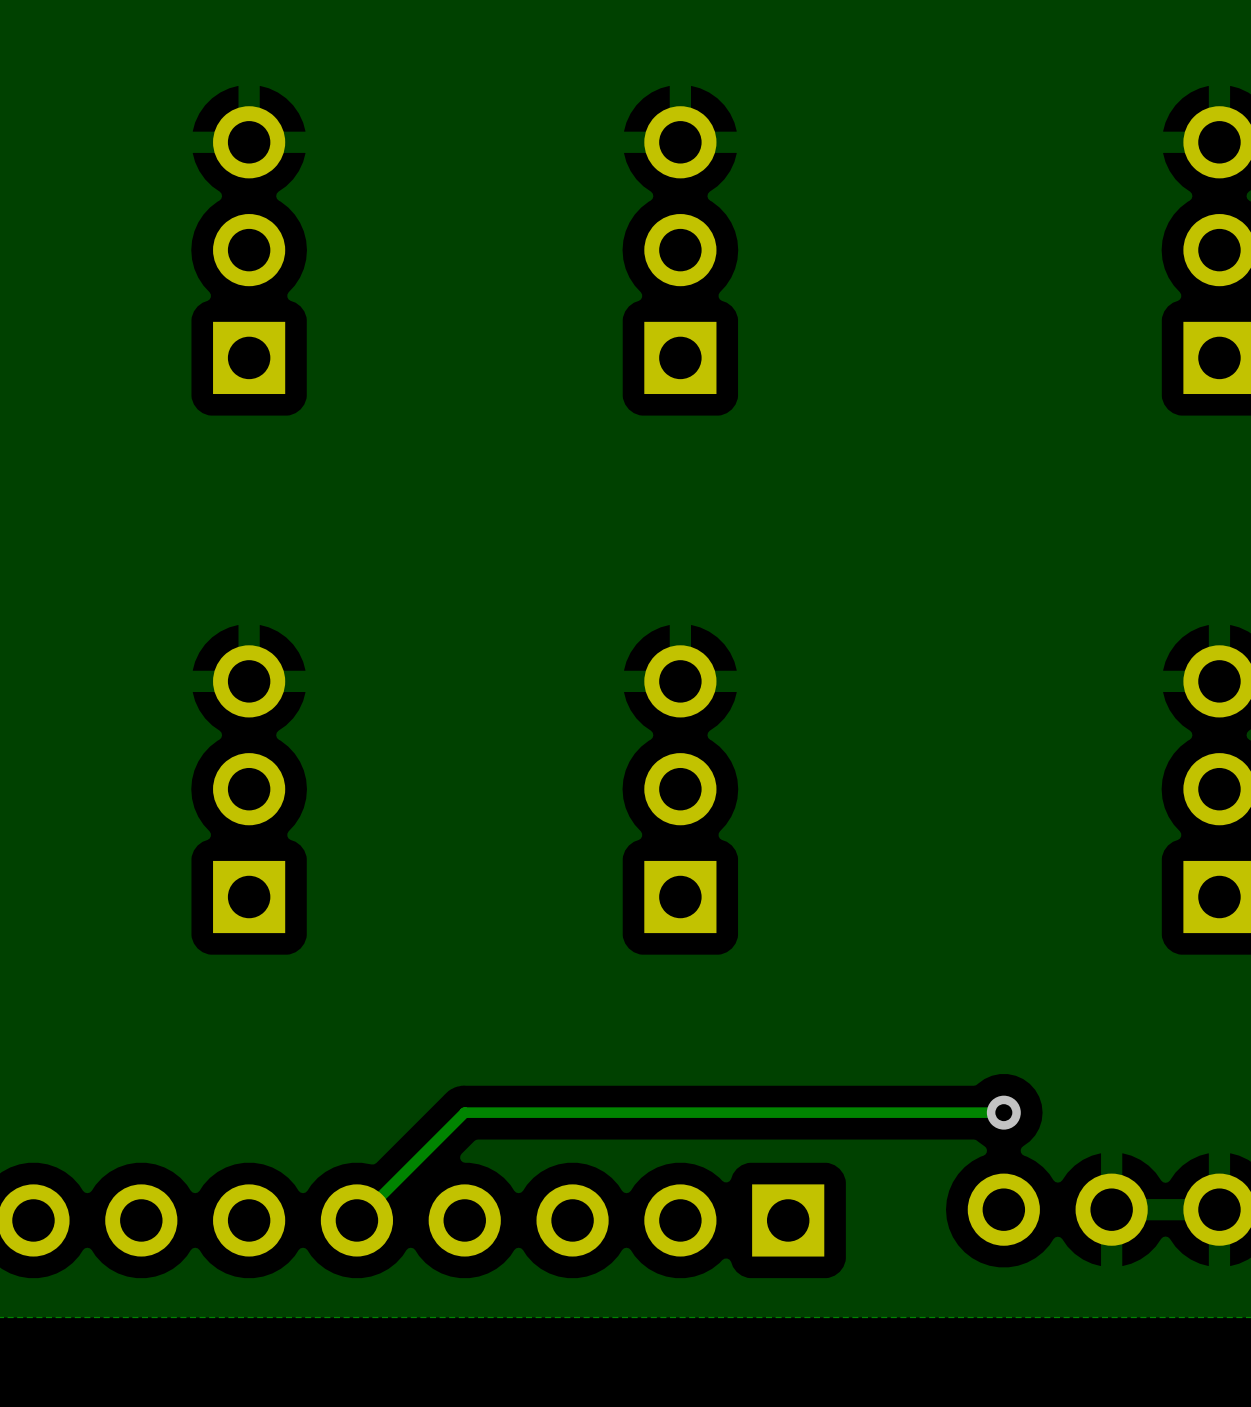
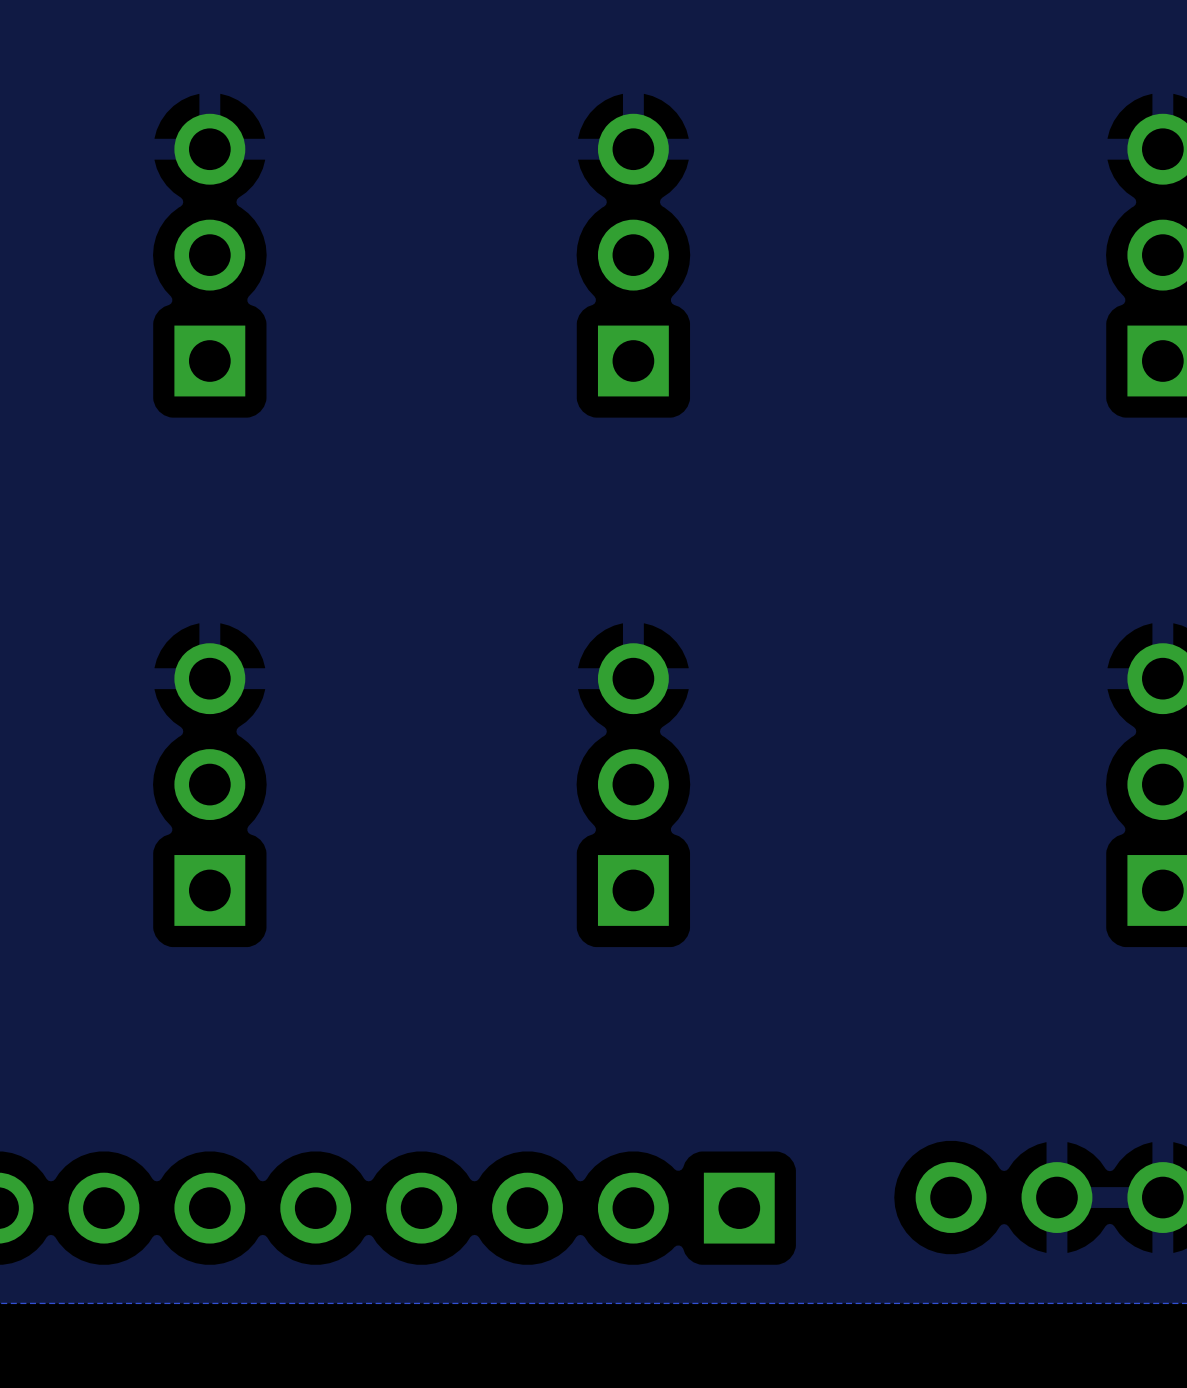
track: (1003, 1112) (464, 1112) (356, 1220) -> none
via: (1003, 1112) -> none

